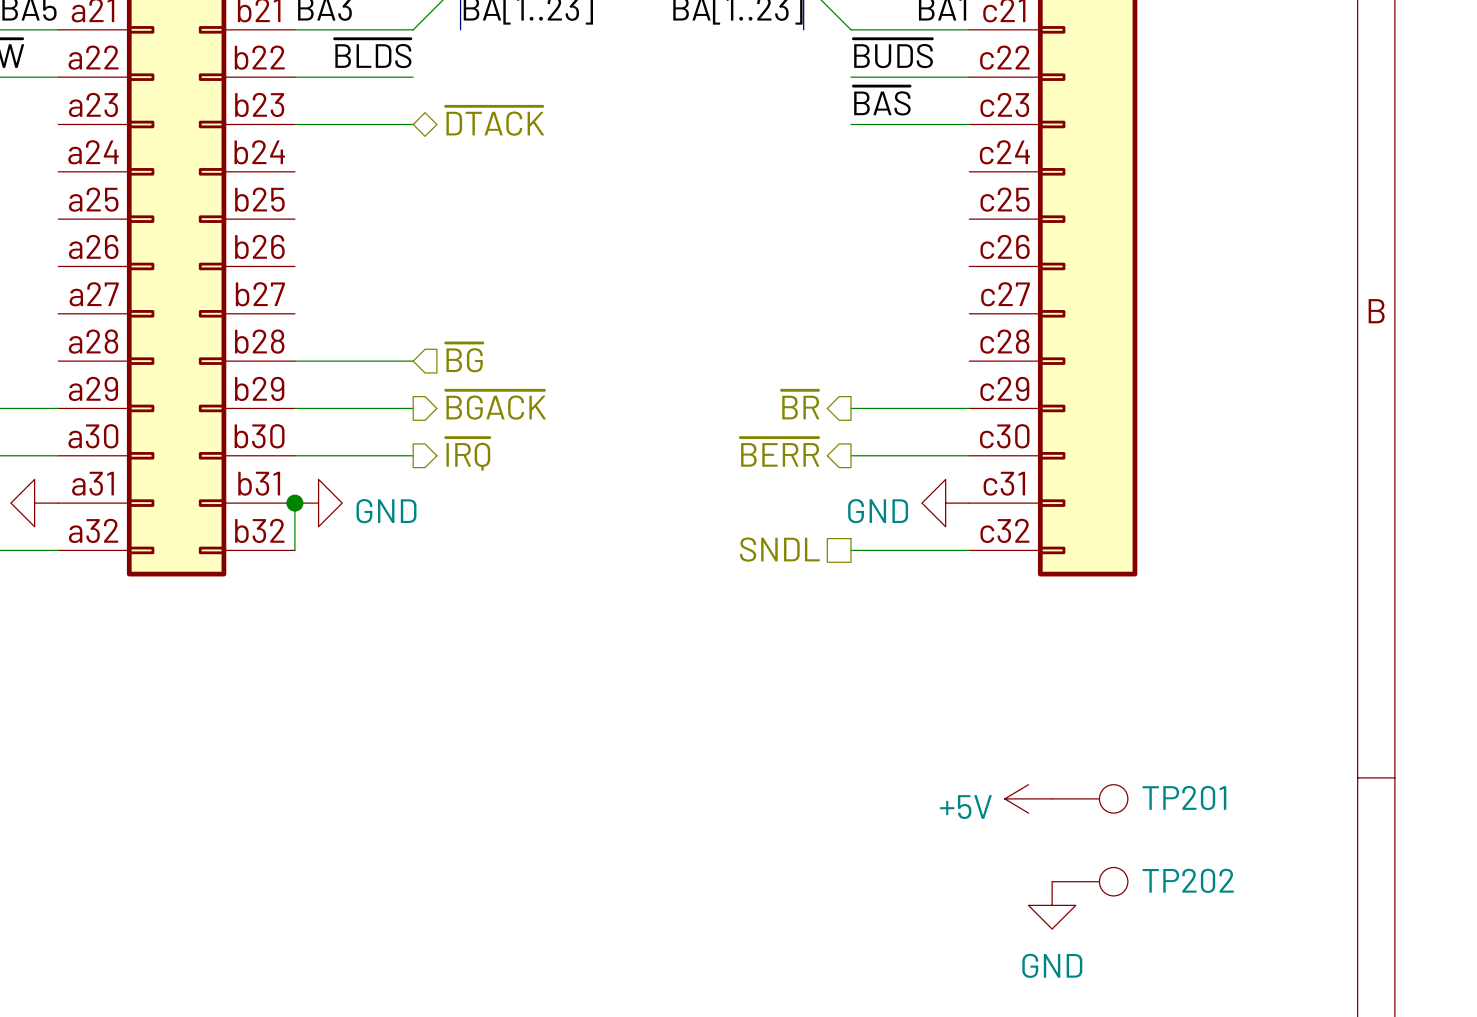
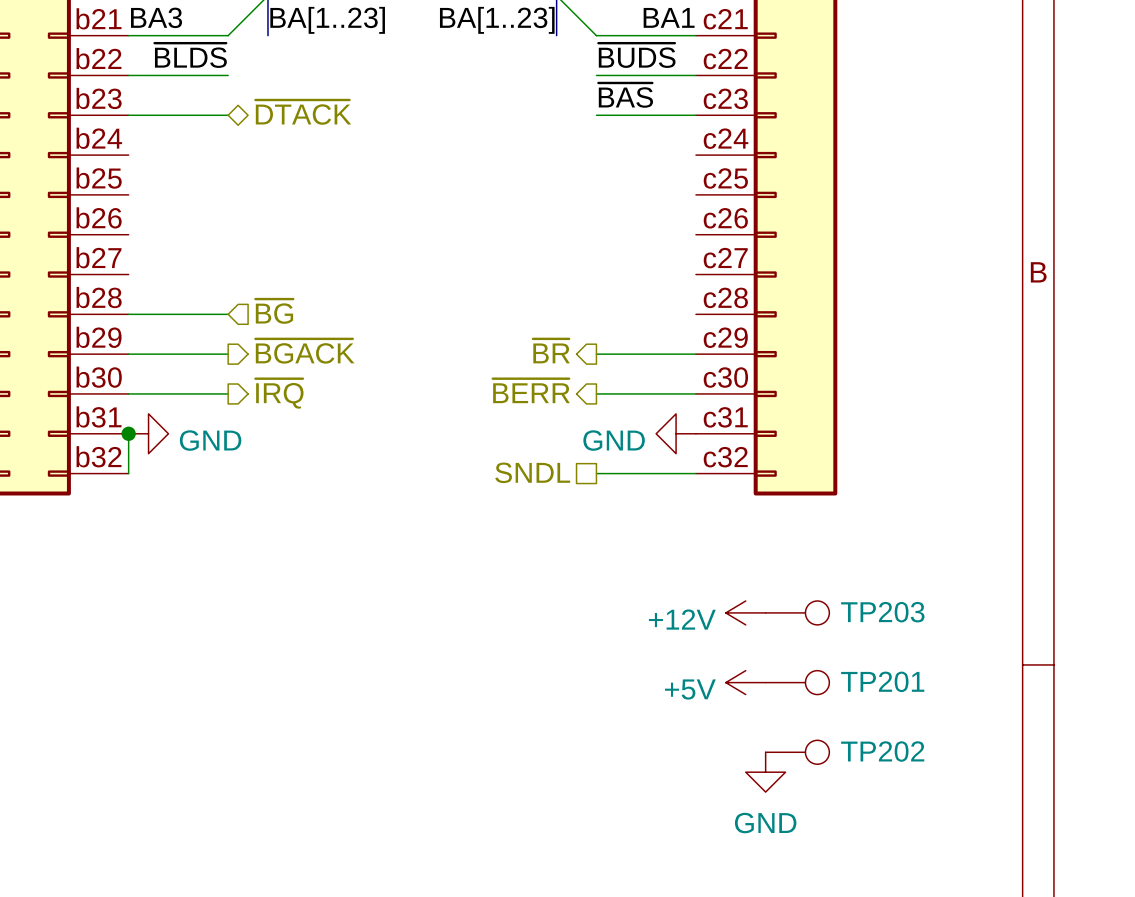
power symbol: none -> +12V (745, 612)
TP203: none -> (797, 612)

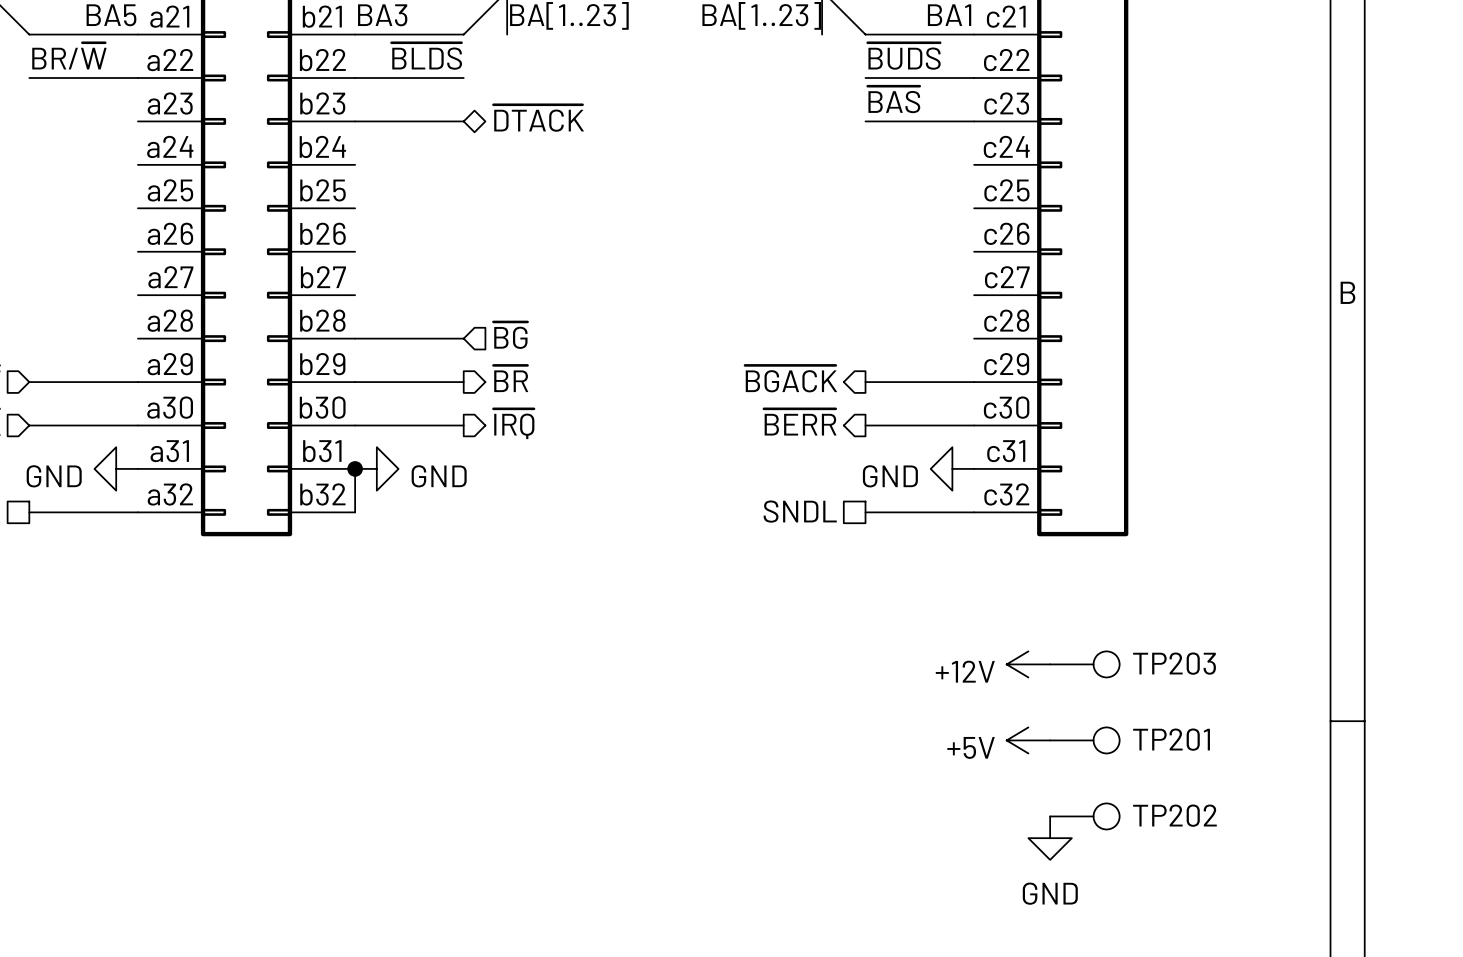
hierarchical label: ~{BGACK} (304, 351) -> ~{BR} (510, 378)
hierarchical label: ~{BR} (551, 351) -> ~{BGACK} (791, 378)

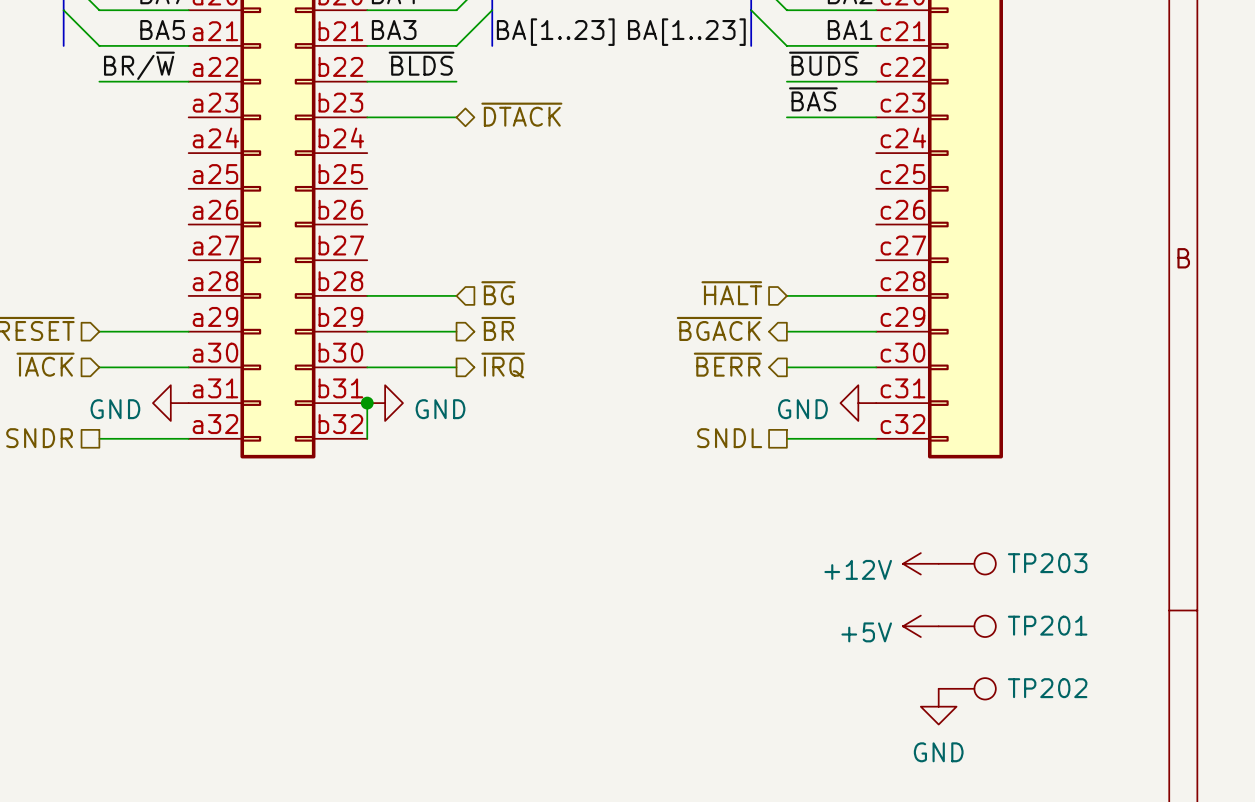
hierarchical label: none -> ~{HALT} (731, 293)
wire: none -> (786, 295) (876, 295)

